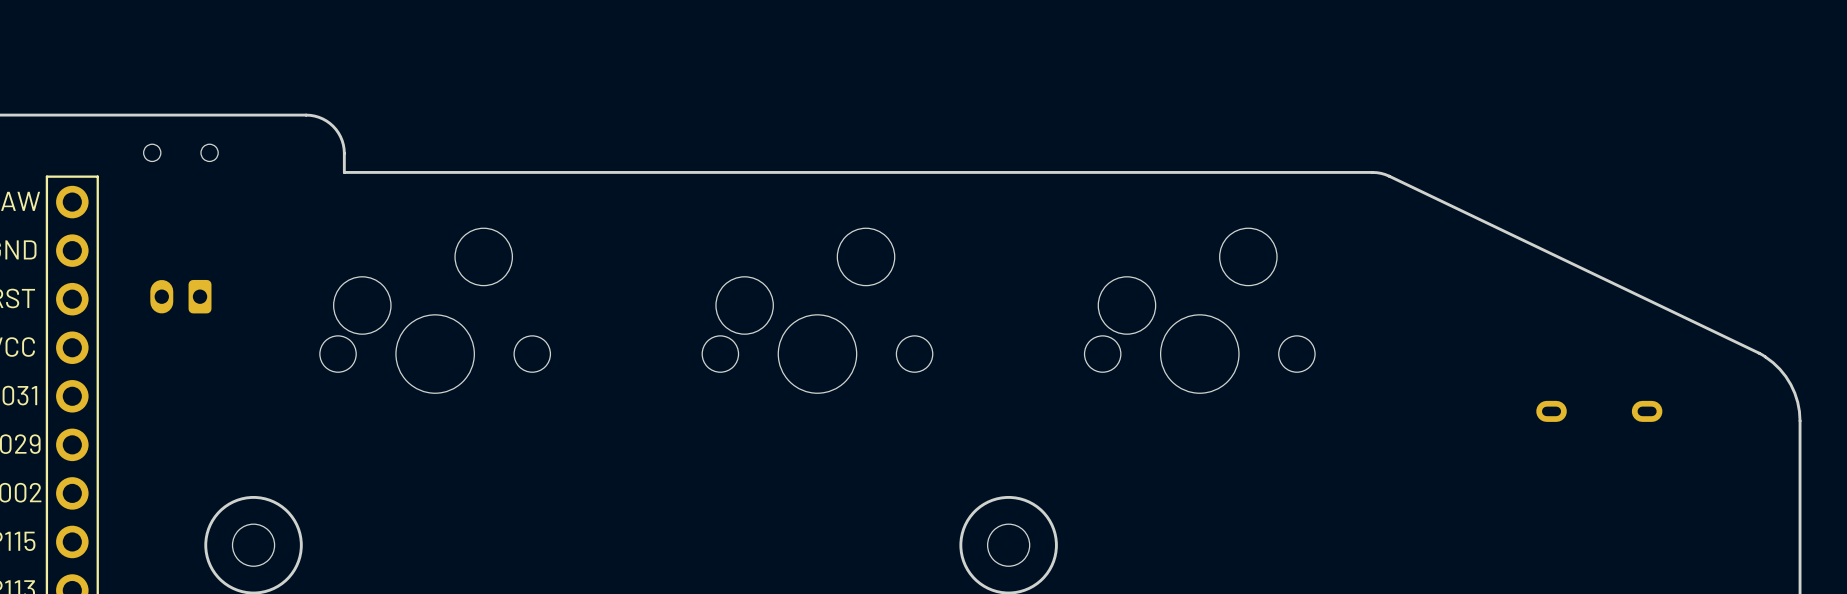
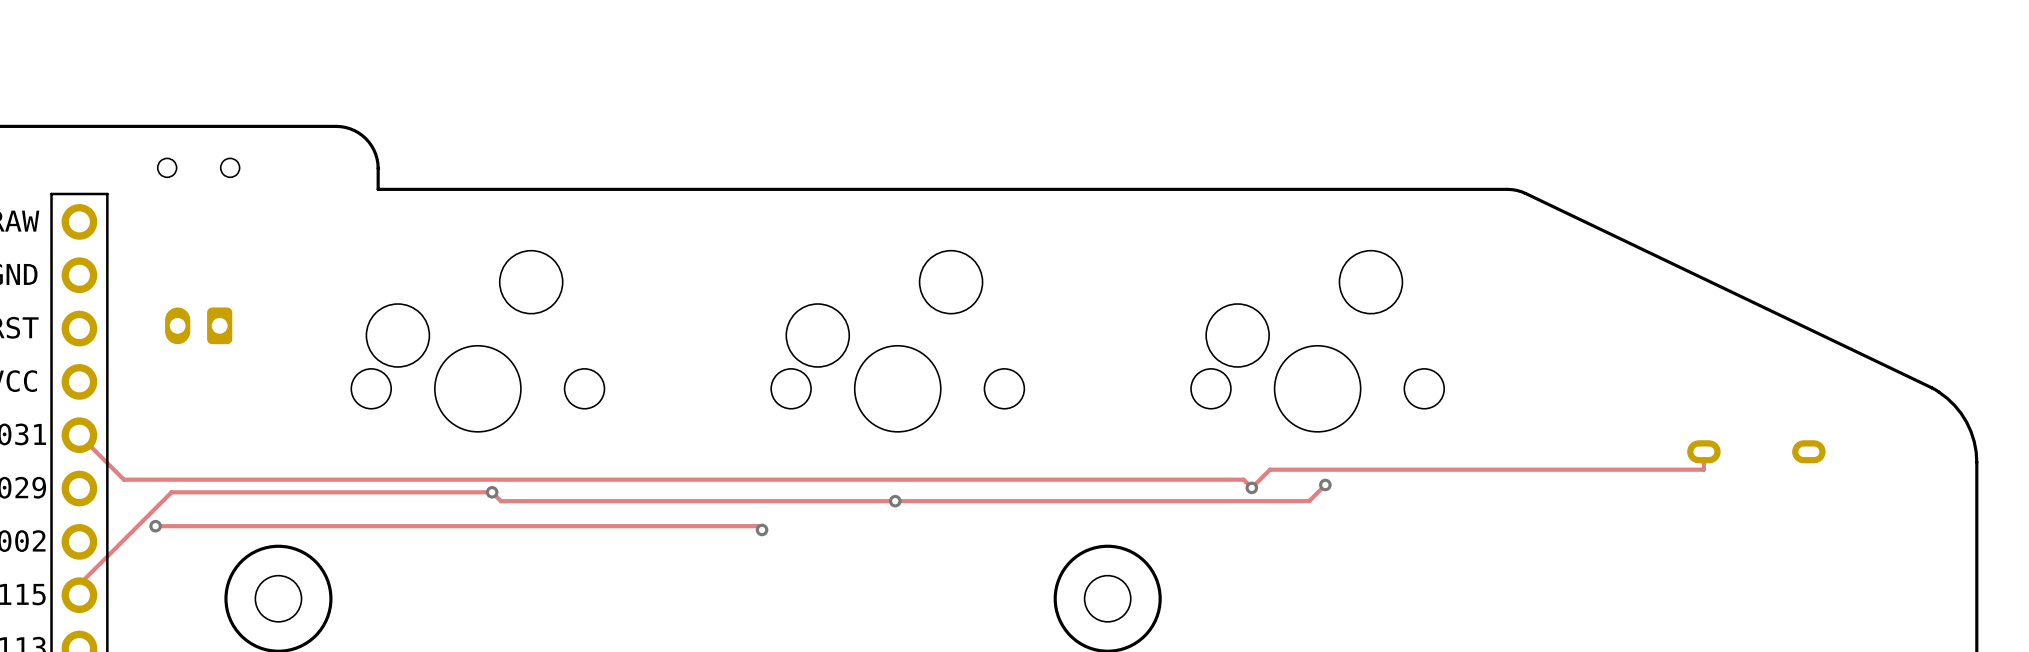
track: none -> (79, 435) (123, 479) (1243, 479) (1251, 487) (1270, 469) (1703, 469) (1703, 451)
track: none -> (1325, 484) (1309, 501) (500, 501) (492, 492) (171, 492) (79, 584) (79, 595)
via: none -> (1325, 484)
via: none -> (1251, 487)
via: none -> (492, 492)
via: none -> (895, 501)
track: none -> (155, 526) (758, 526) (762, 529)
via: none -> (155, 526)
via: none -> (762, 529)

